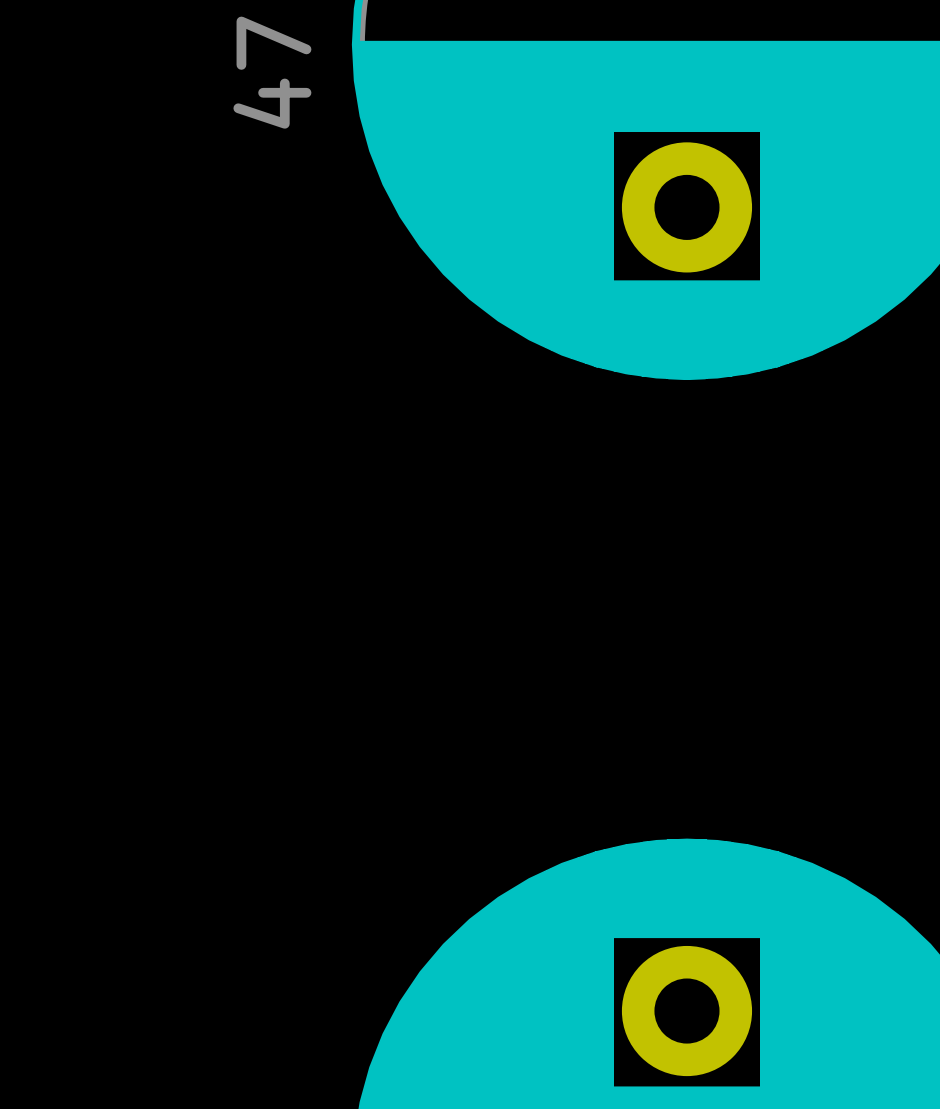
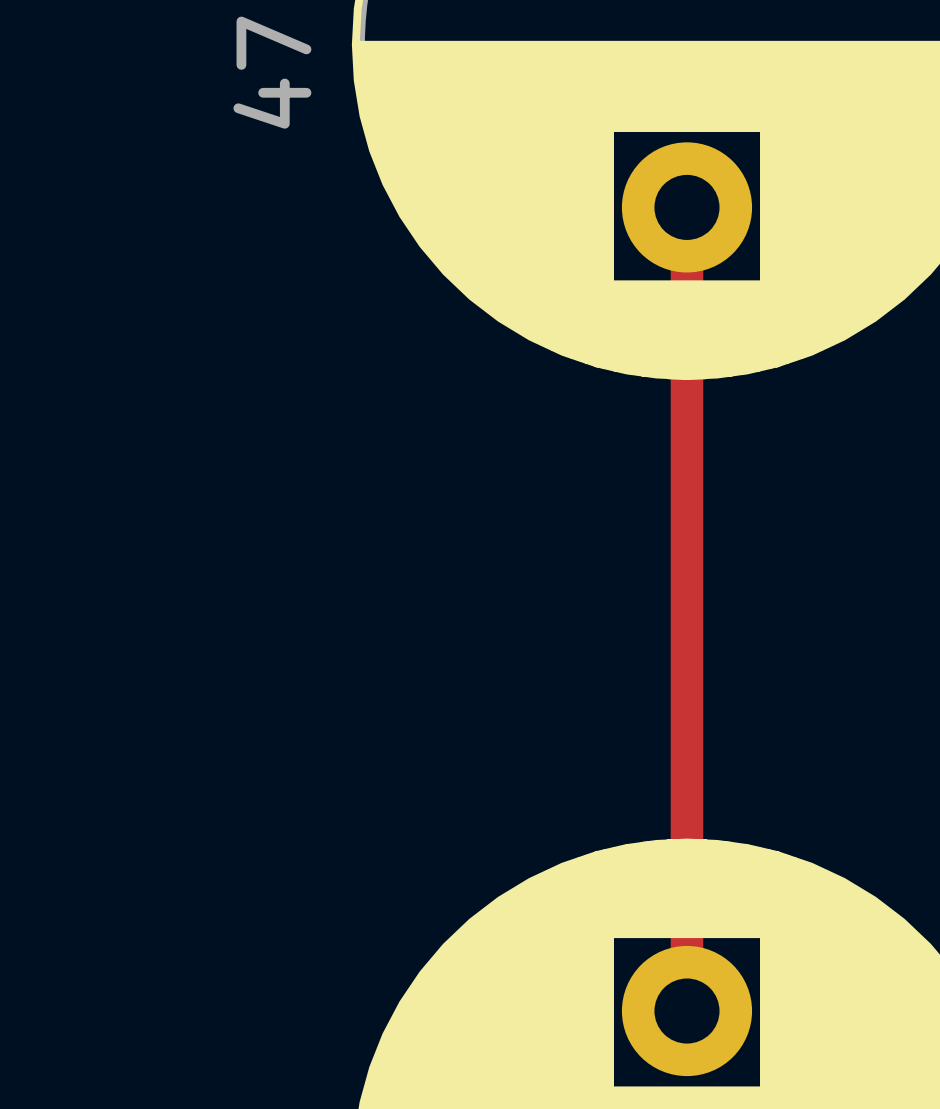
track: none -> (686, 207) (686, 1011)

